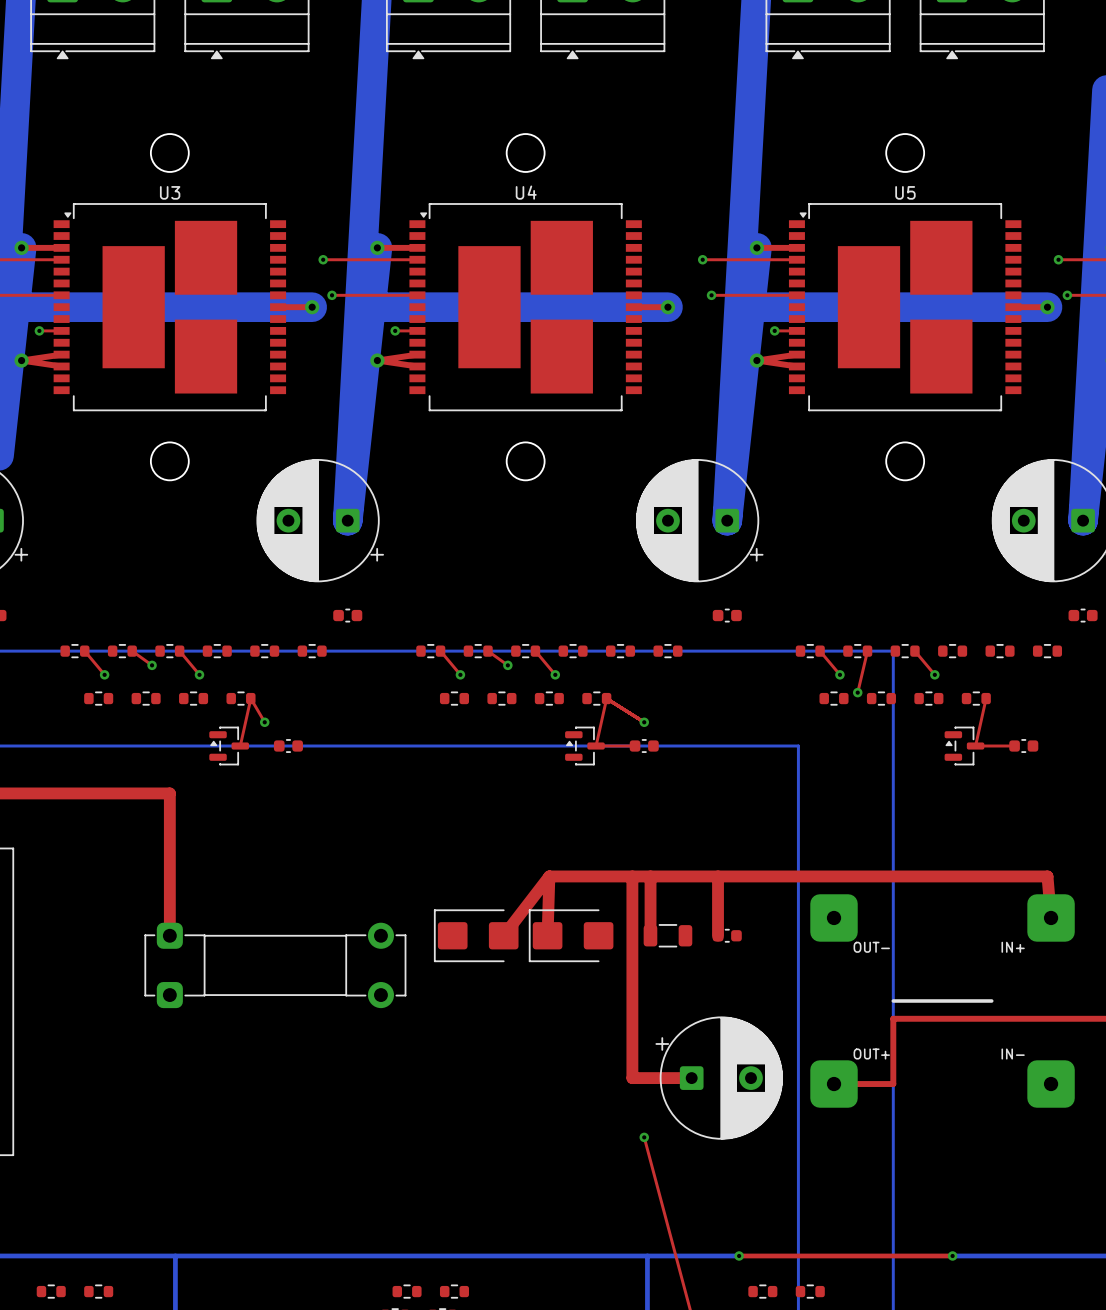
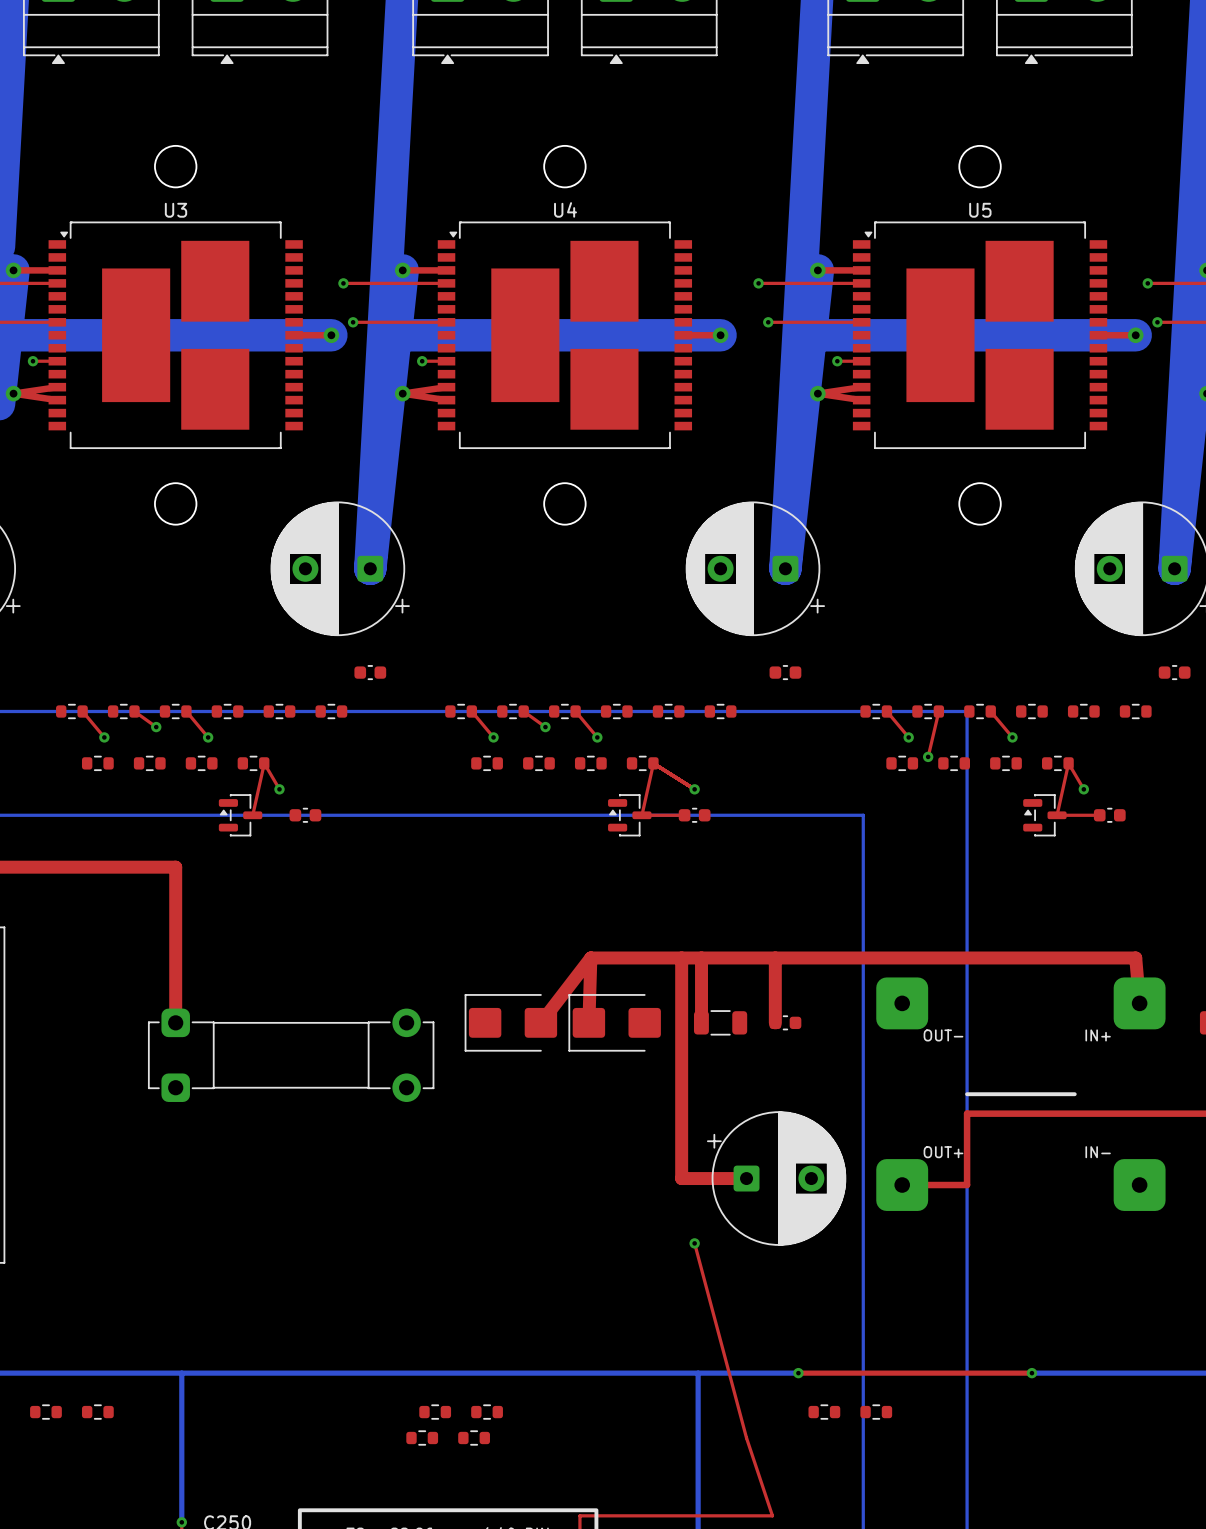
top track: none -> (1068, 763) (1083, 789)
via: none -> (1083, 789)

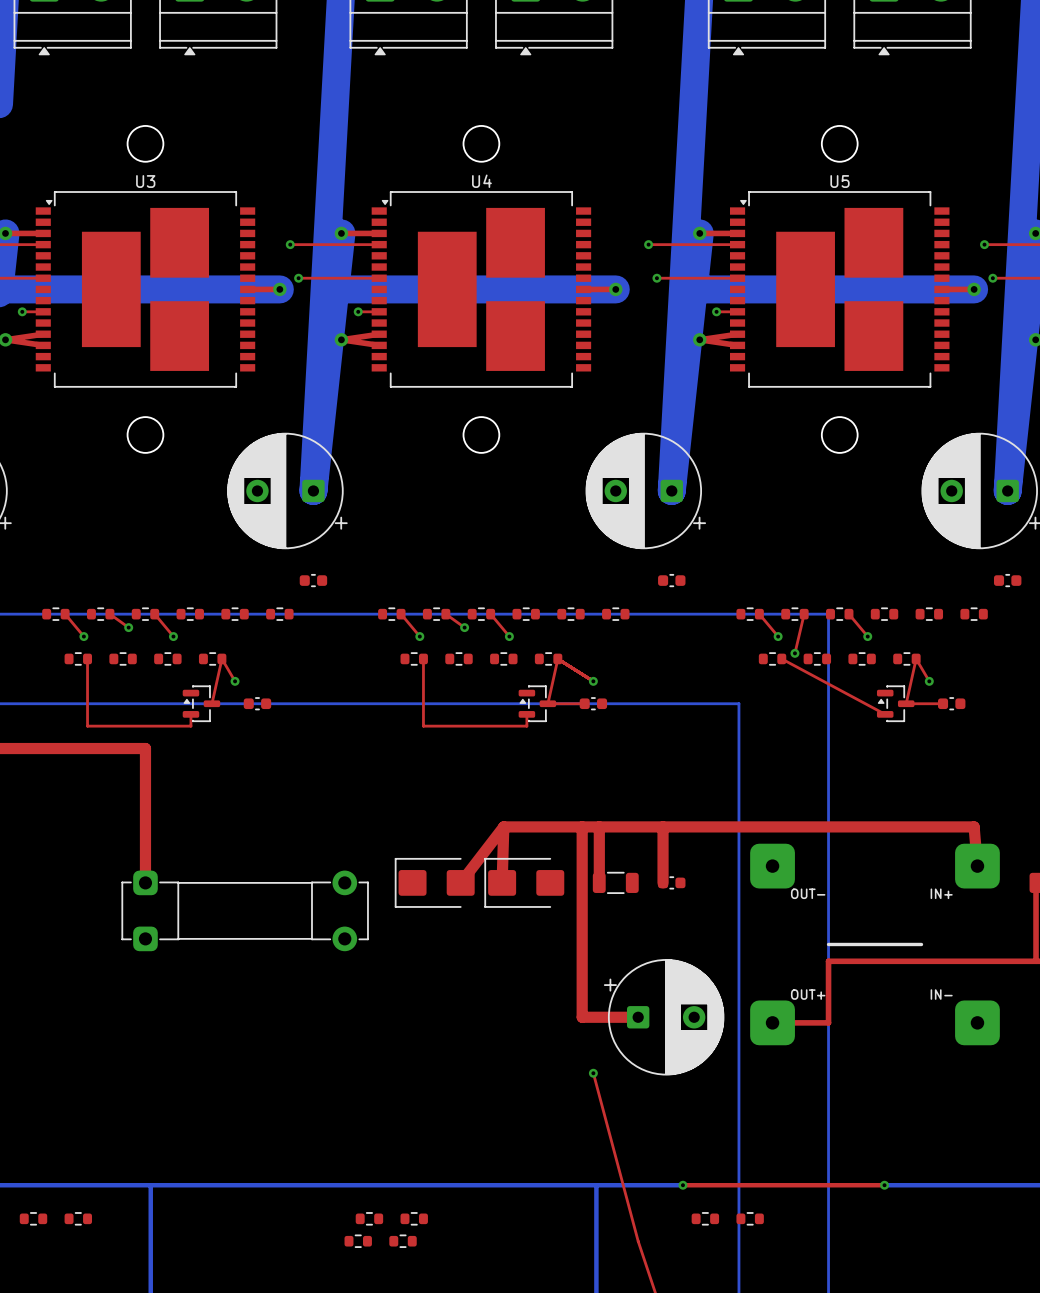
top track: none -> (87, 658) (87, 726) (190, 726) (190, 714)
top track: none -> (423, 658) (423, 726) (526, 726) (526, 714)
top track: none -> (781, 658) (885, 714)

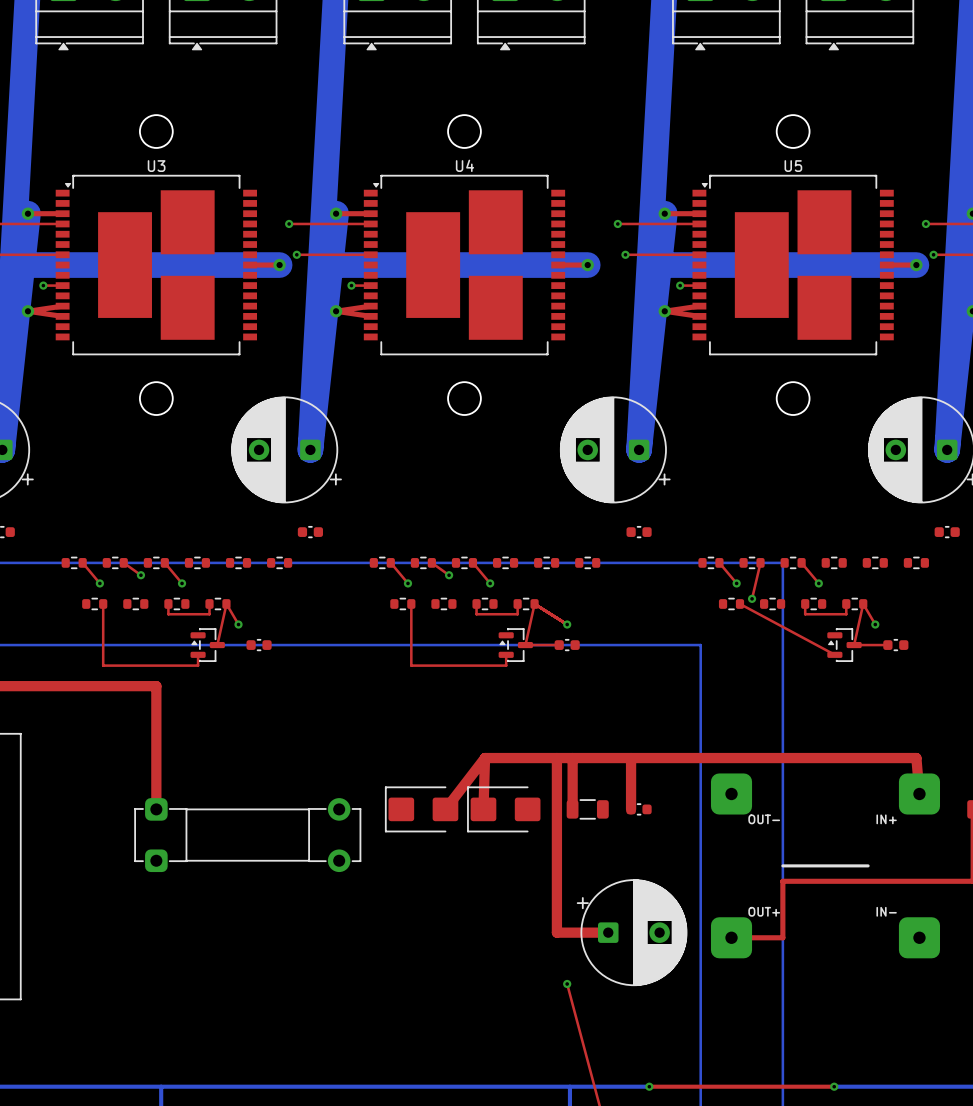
top track: none -> (168, 603) (168, 614) (209, 614) (209, 603)
top track: none -> (476, 603) (476, 614) (517, 614) (517, 603)
top track: none -> (805, 603) (805, 614) (846, 614) (846, 603)

